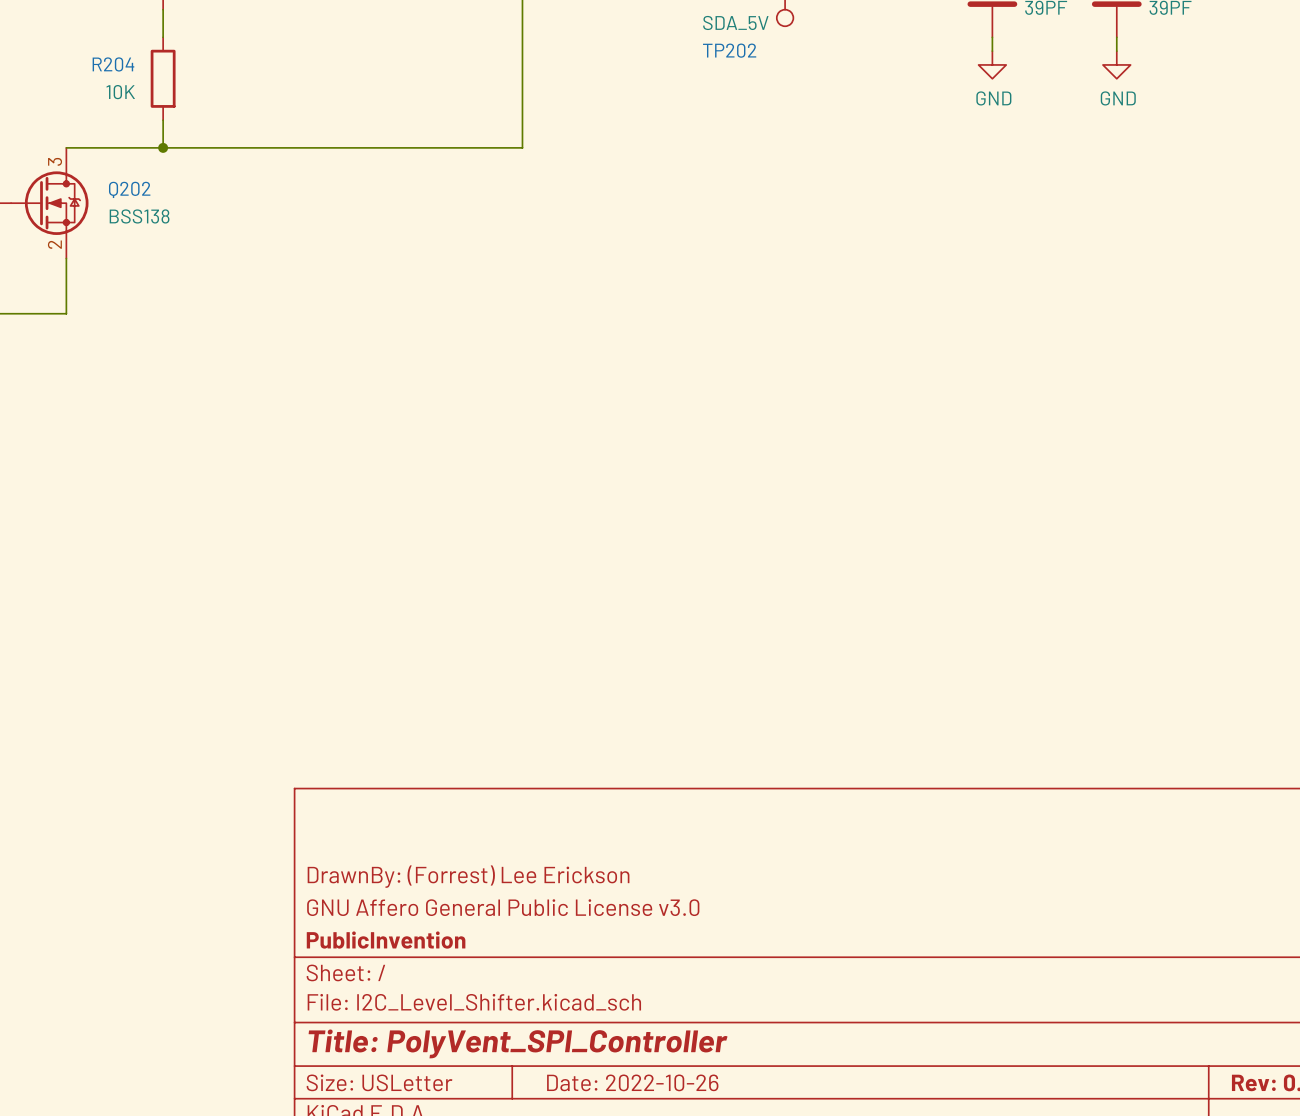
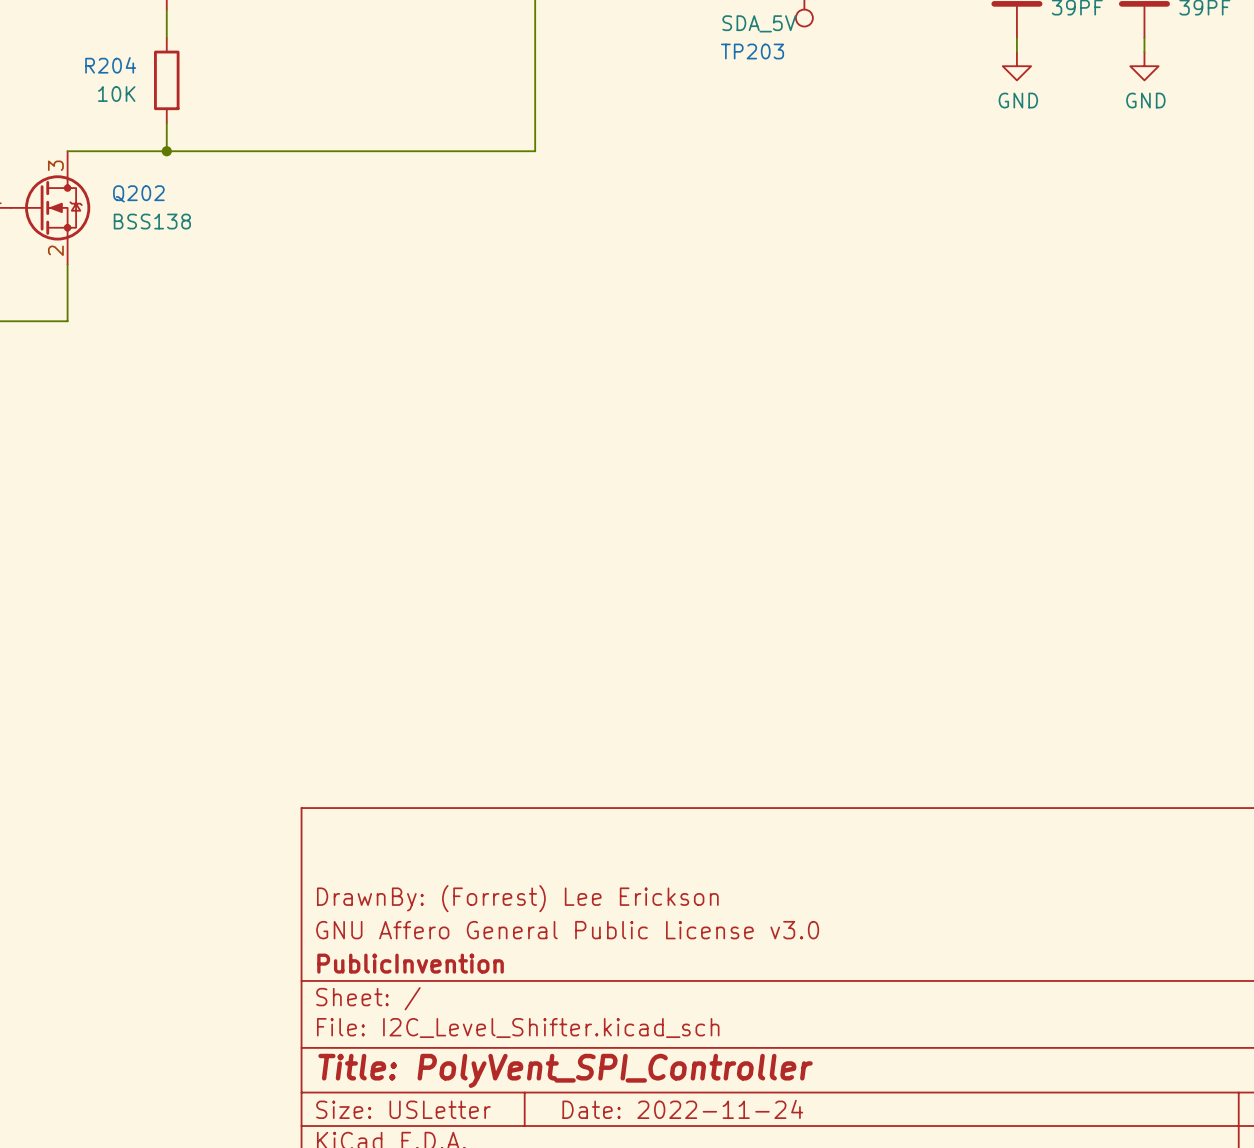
TP202 name: TP202 (729, 50) -> TP203 (752, 51)
title block: Date: 2022-10-26 (632, 1082) -> Date: 2022-11-24 (682, 1109)

